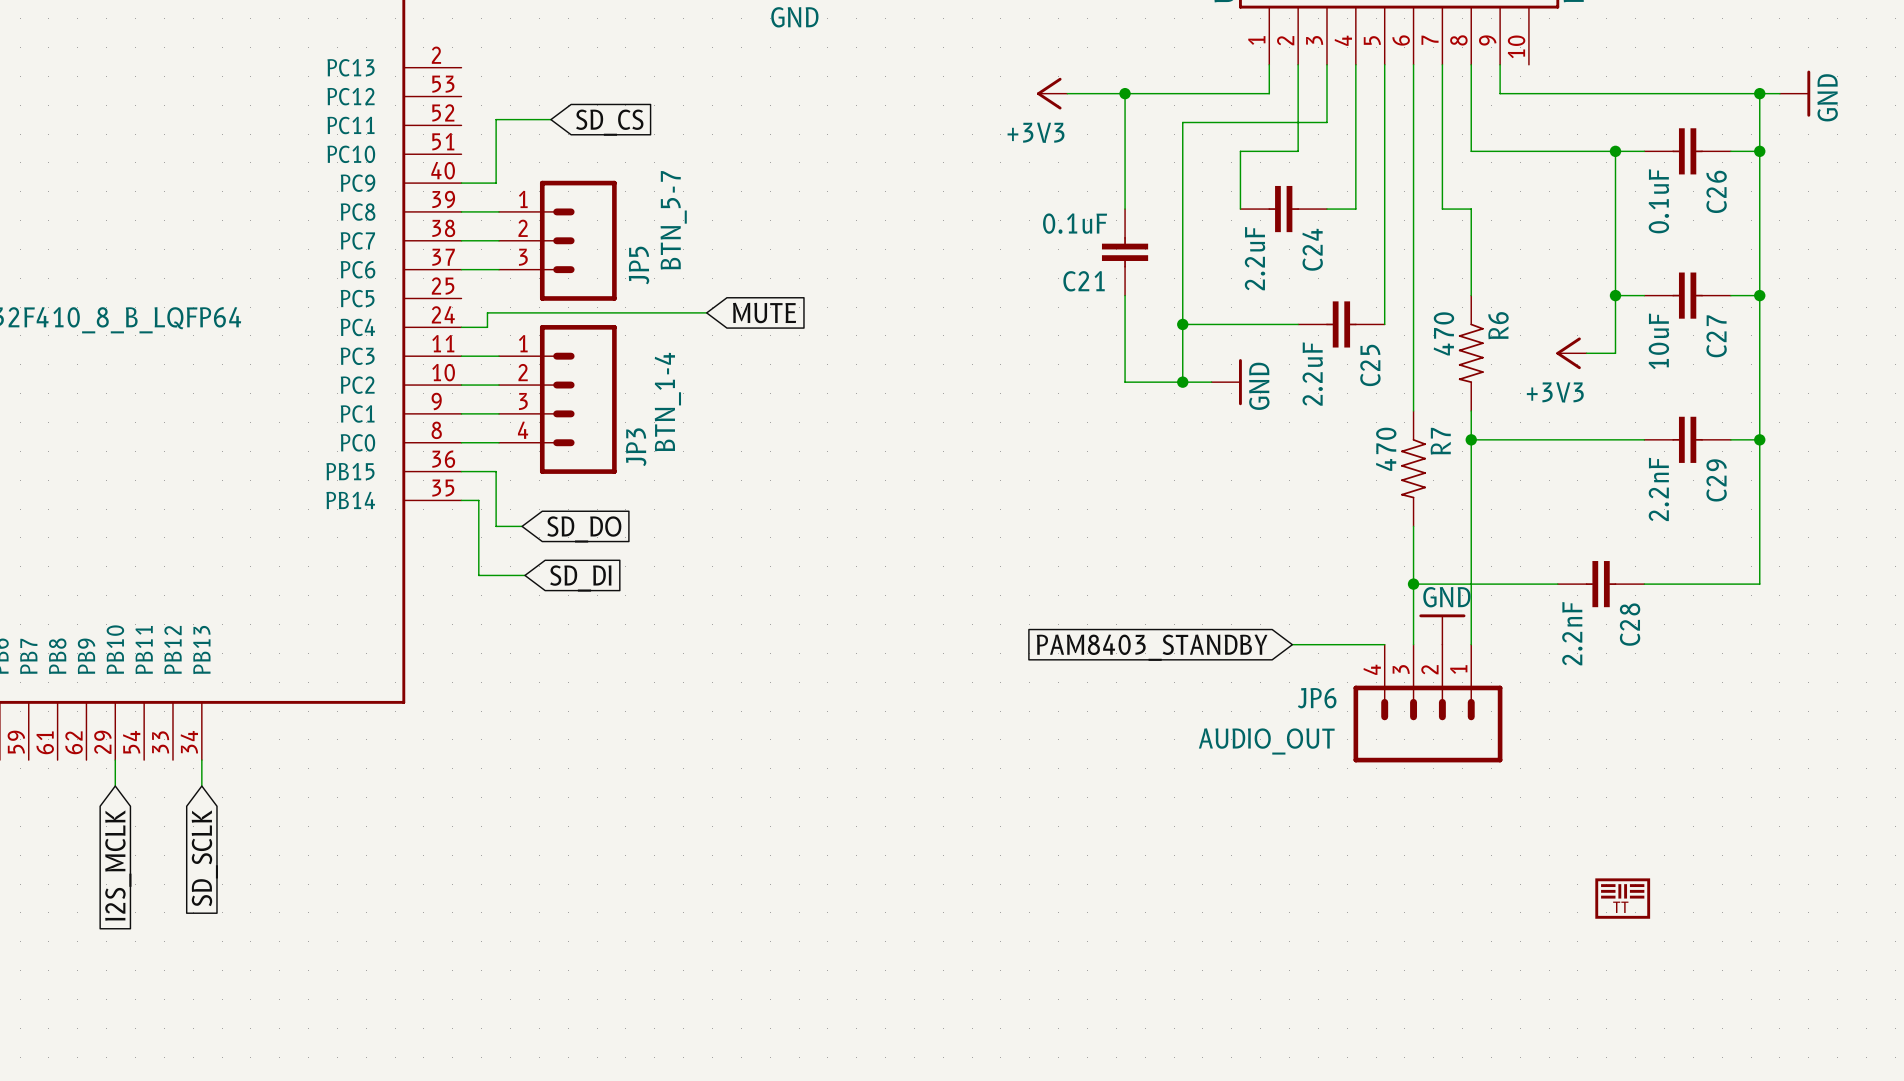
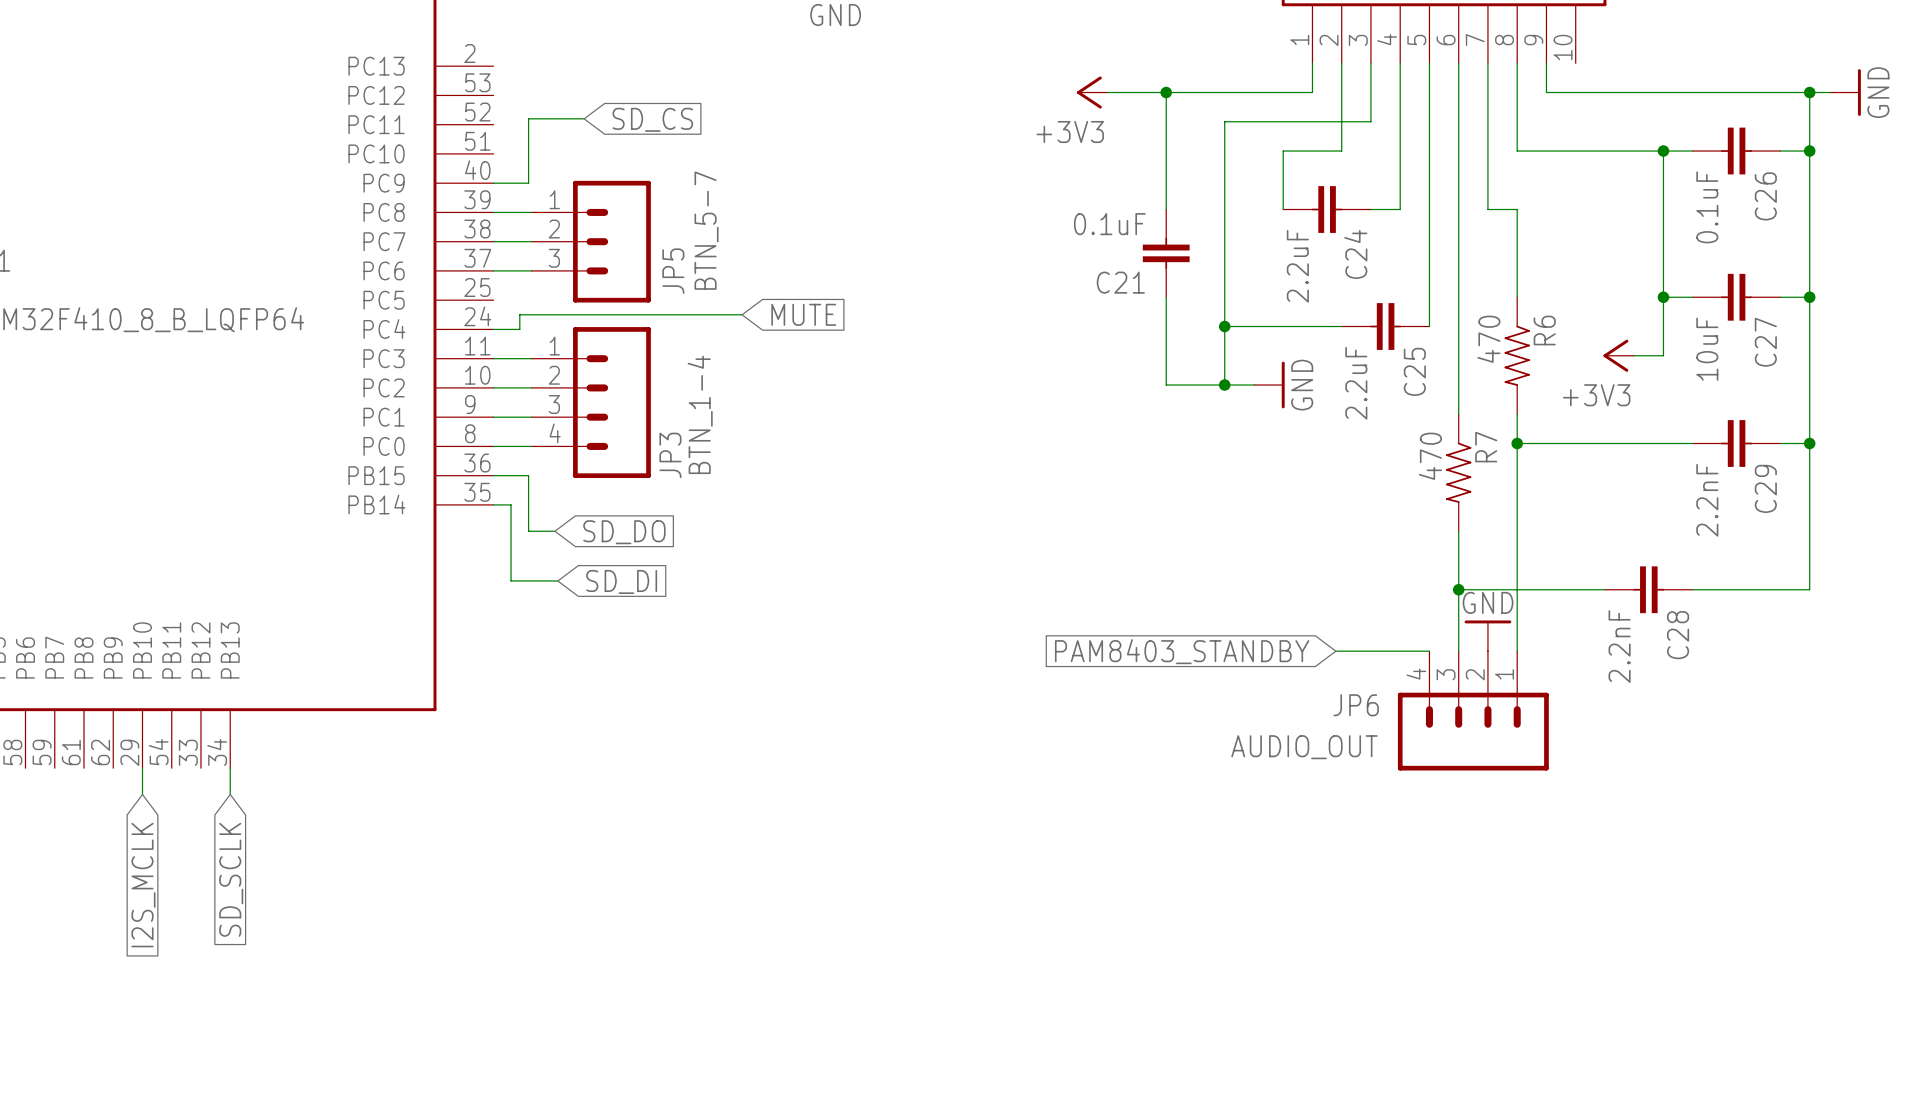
drawing: [1595, 878, 1651, 919] -> none
text: TT (1620, 907) -> none

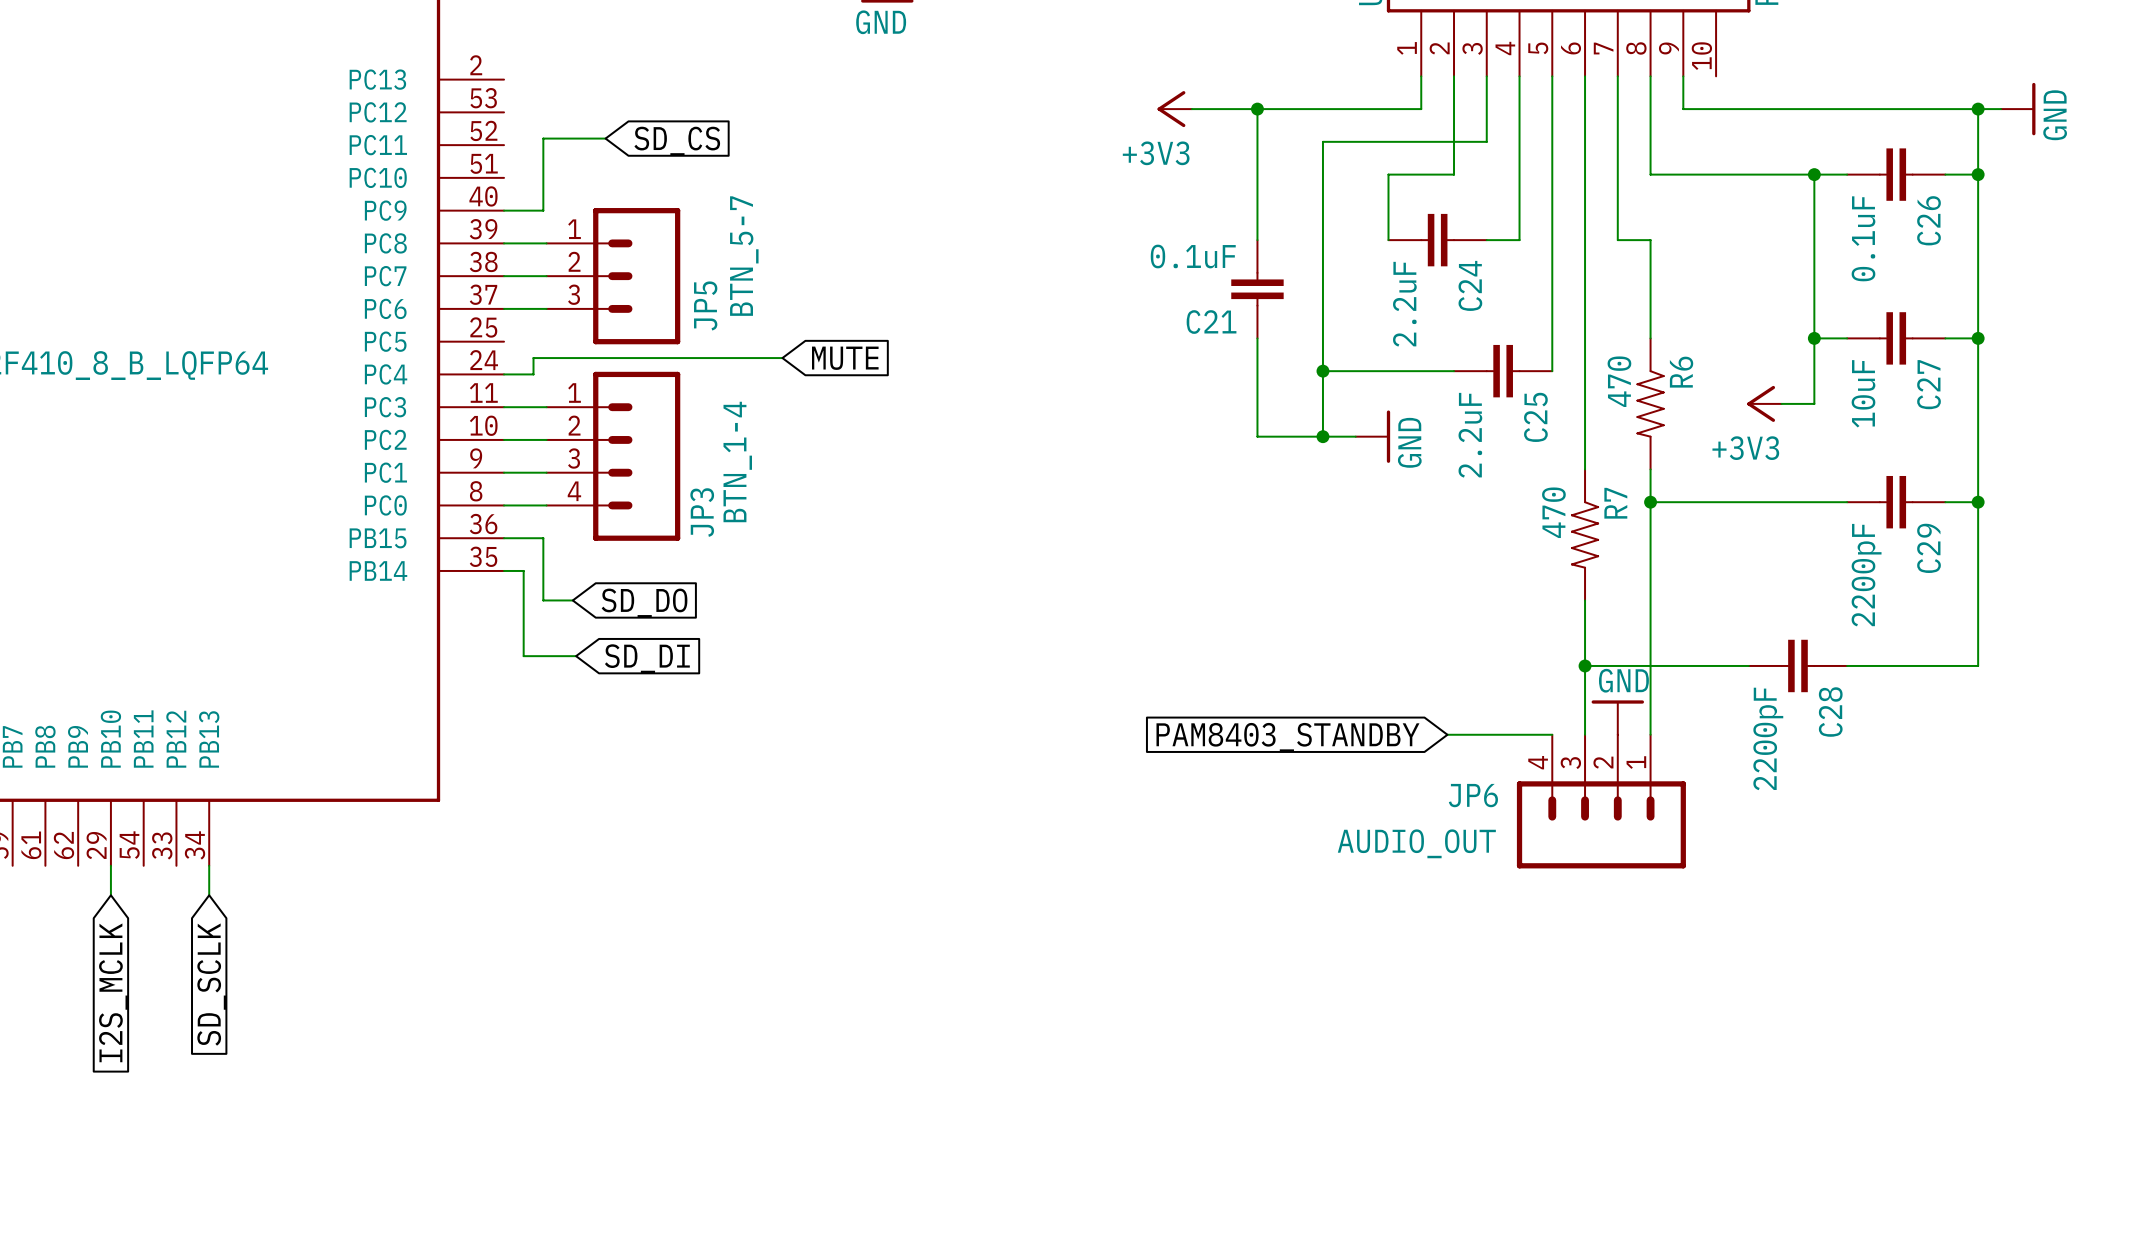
C29 value: 2.2nF (1707, 500) -> 2200pF (1866, 575)
C28 value: 2.2nF (1619, 646) -> 2200pF (1768, 738)

